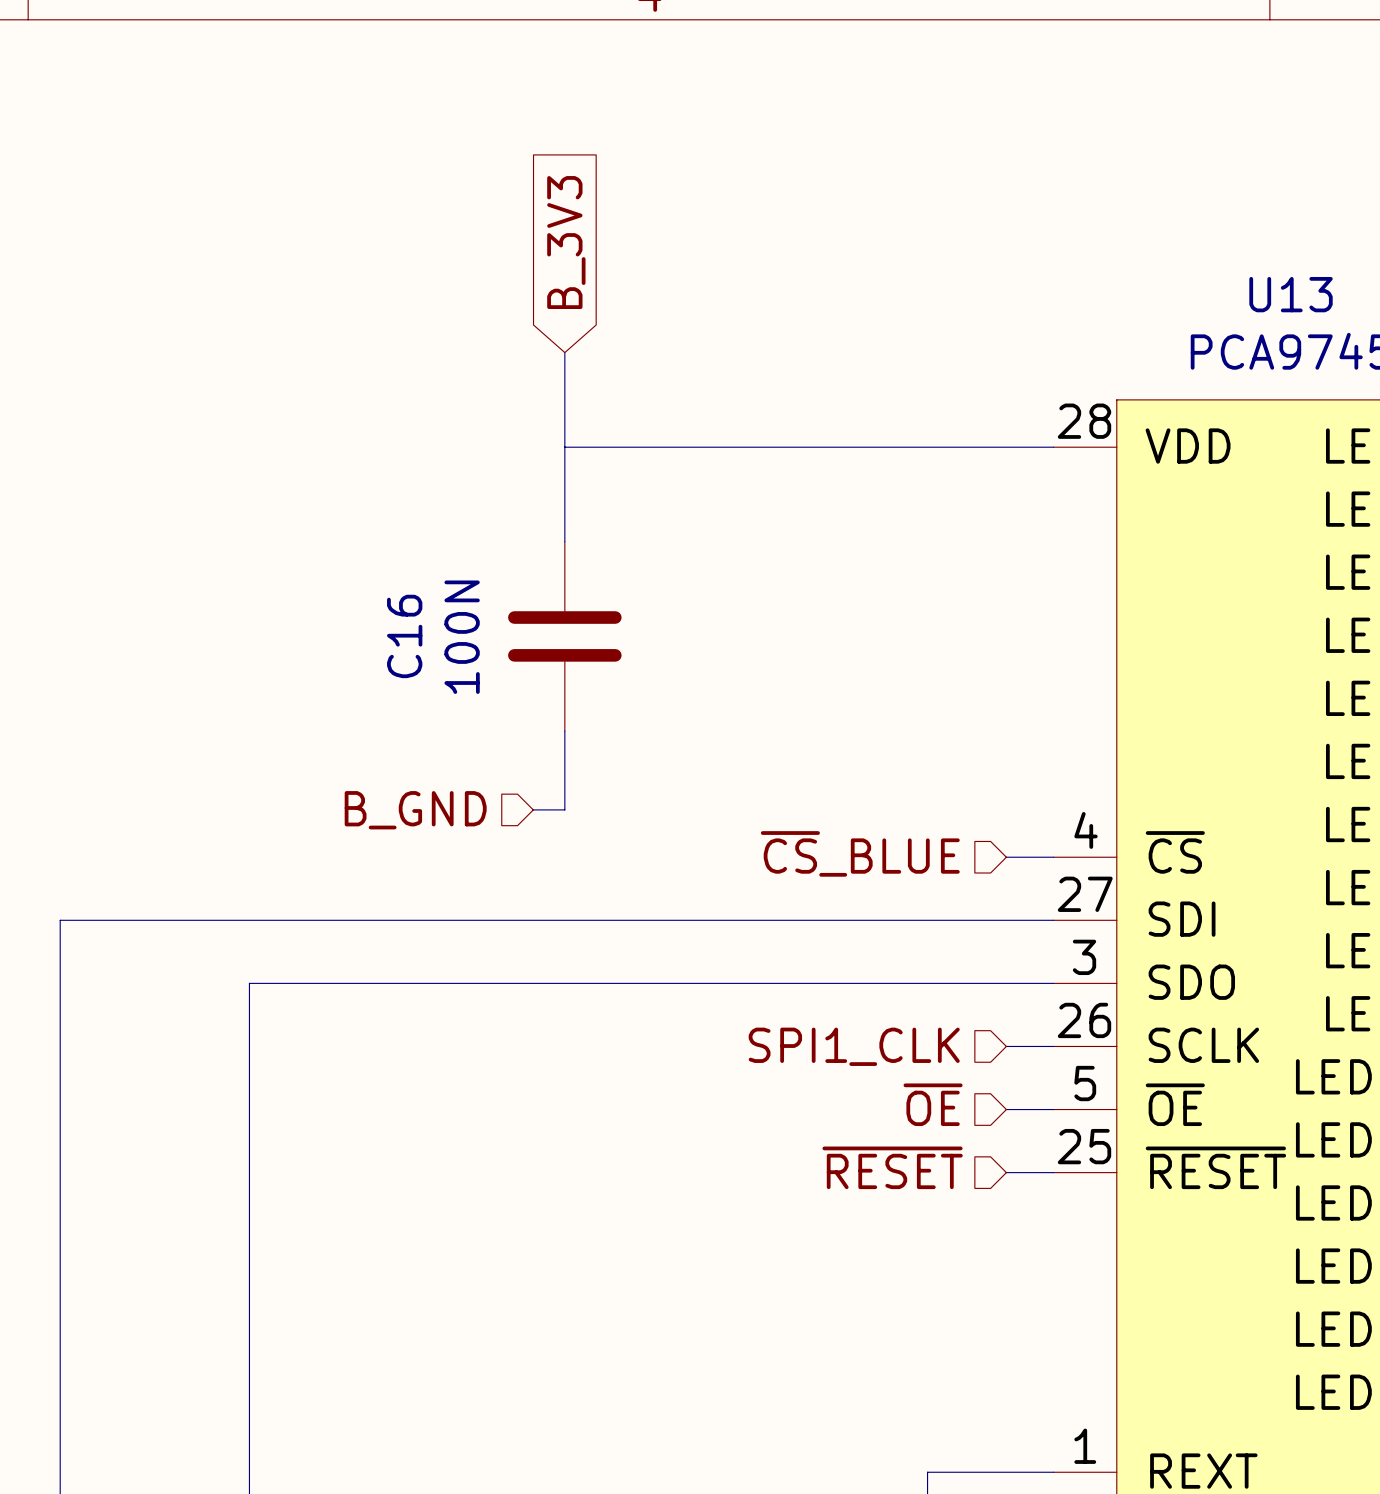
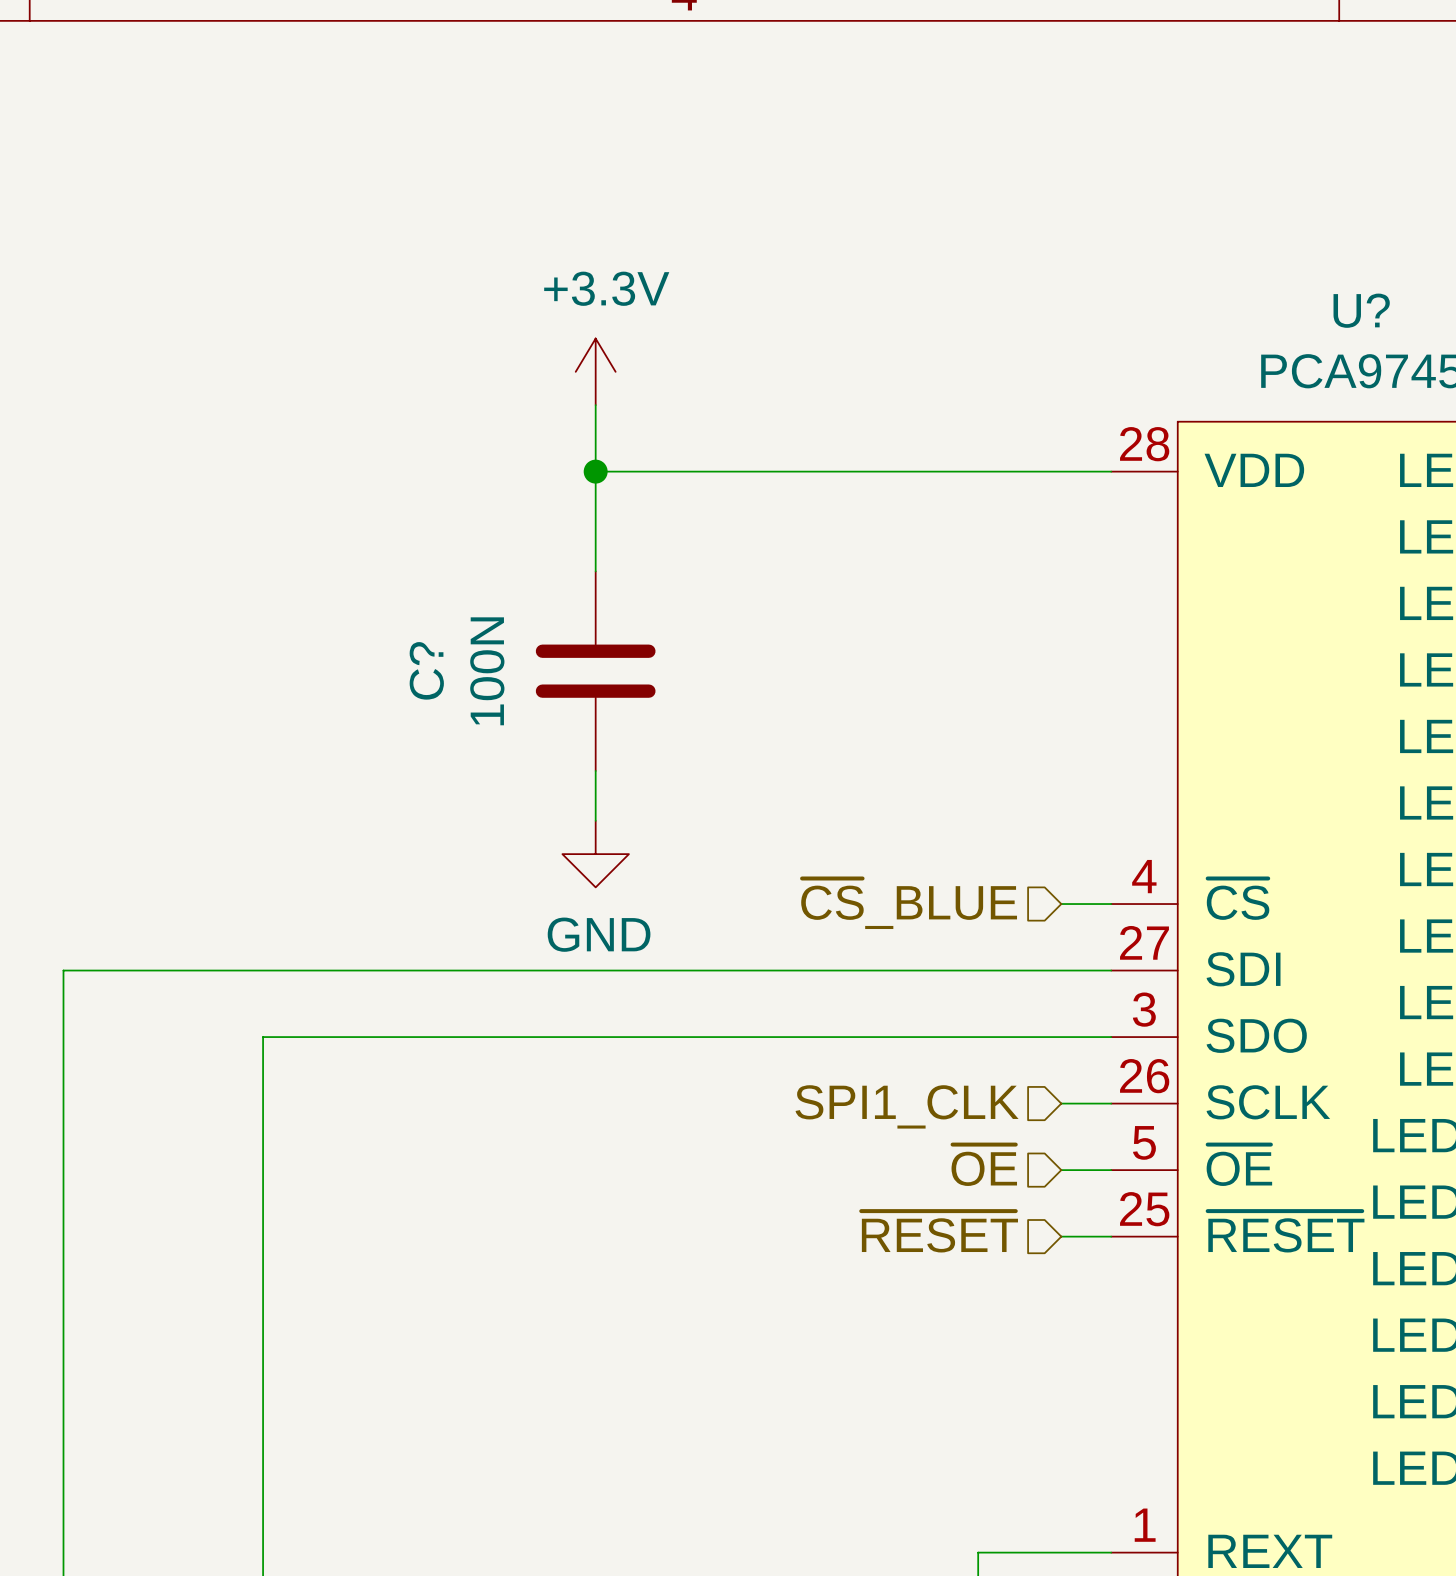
global label: B_3V3 (566, 242) -> none
U13 name: U13 (1291, 294) -> U? (1361, 310)
power symbol: none -> +3.3V (595, 371)
junction: none -> (595, 471)
C16 name: C16 (404, 636) -> C? (426, 670)
power symbol: none -> GND (595, 854)
hierarchical label: B_GND (415, 810) -> none

